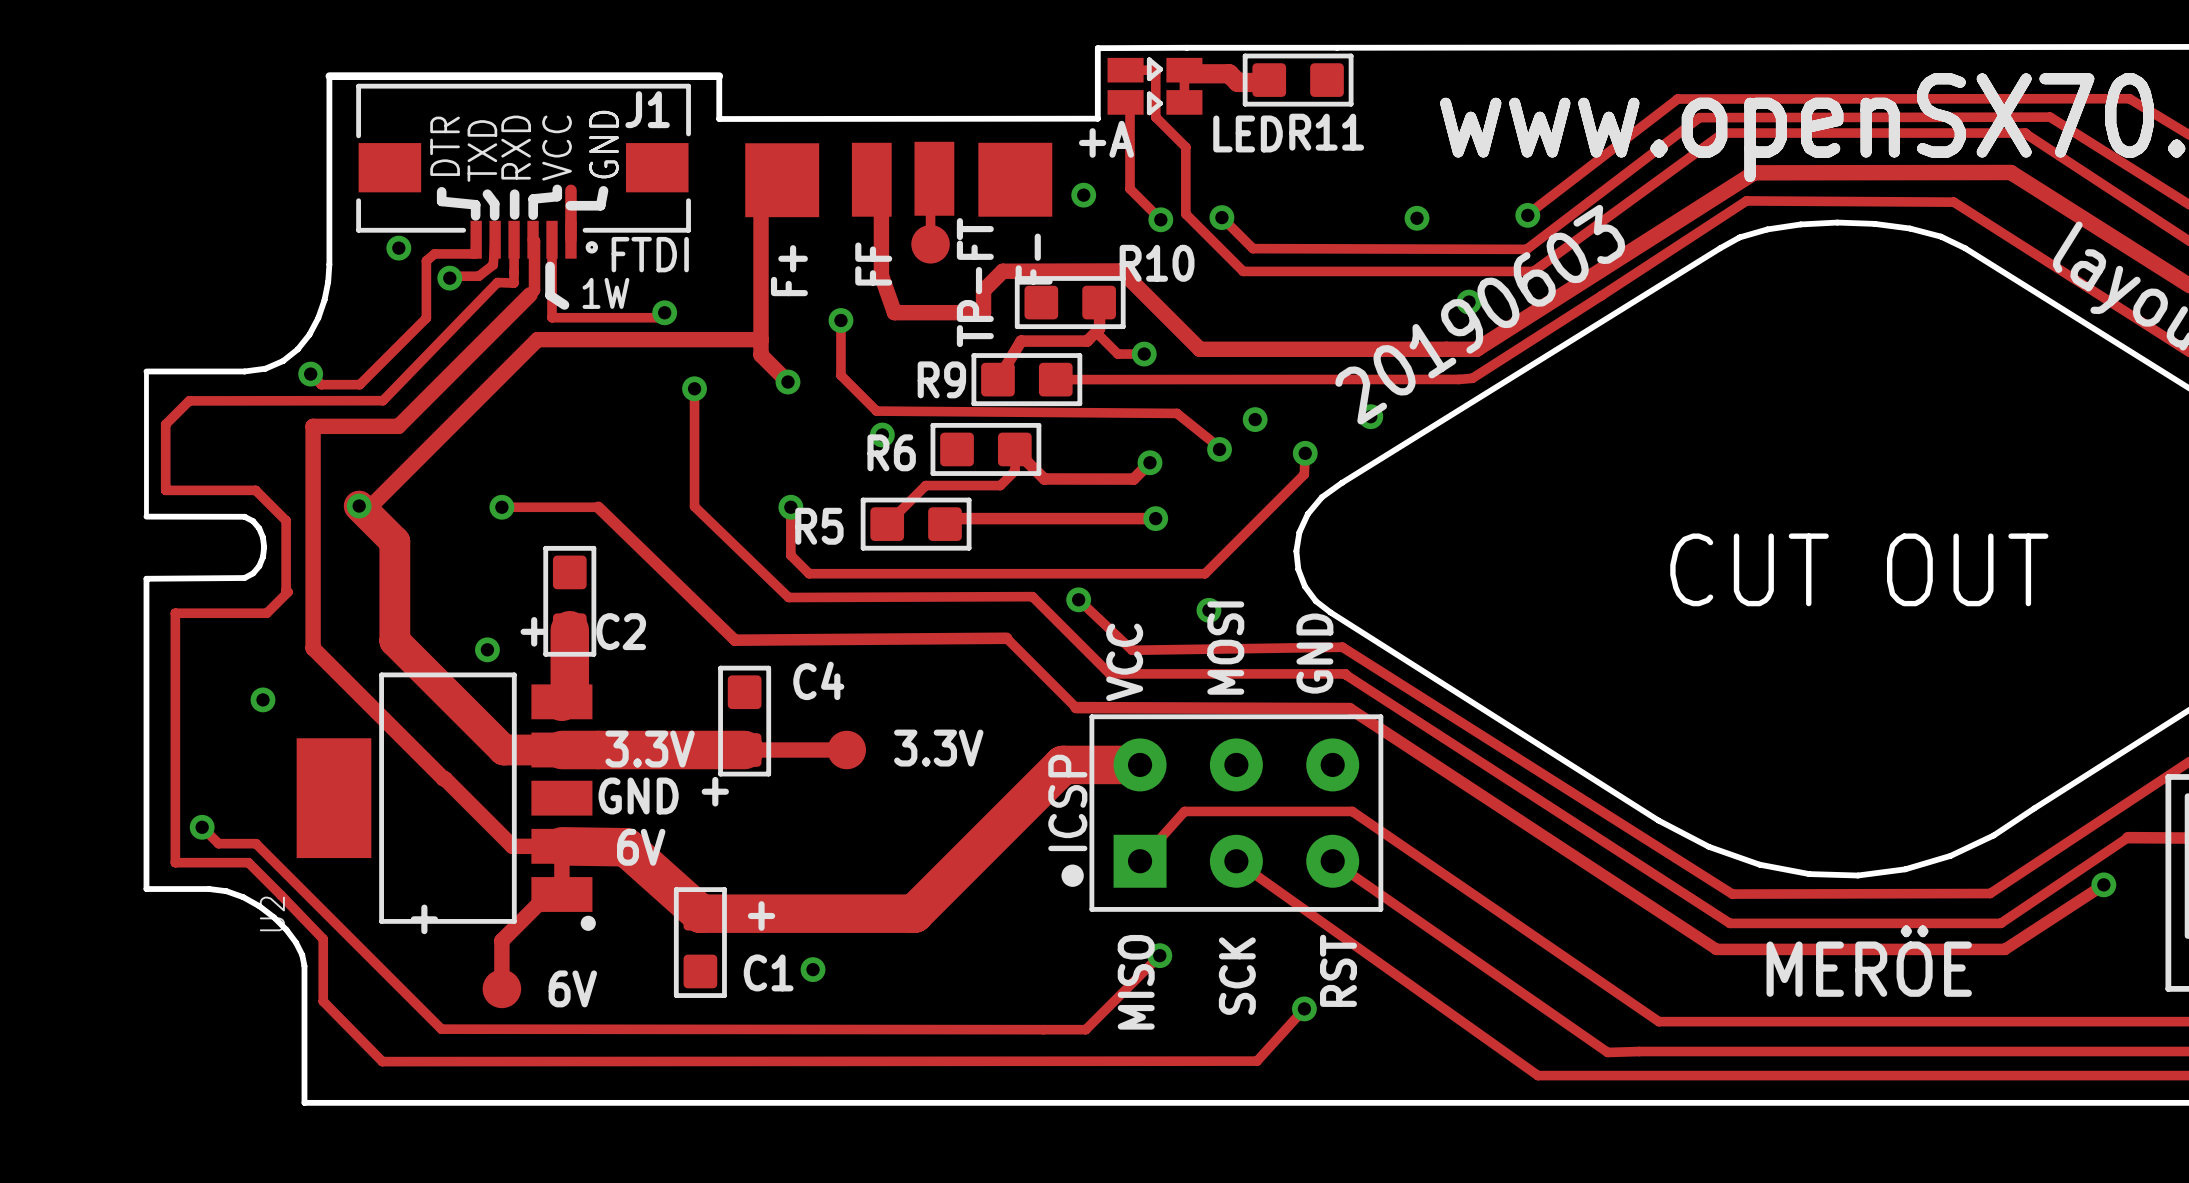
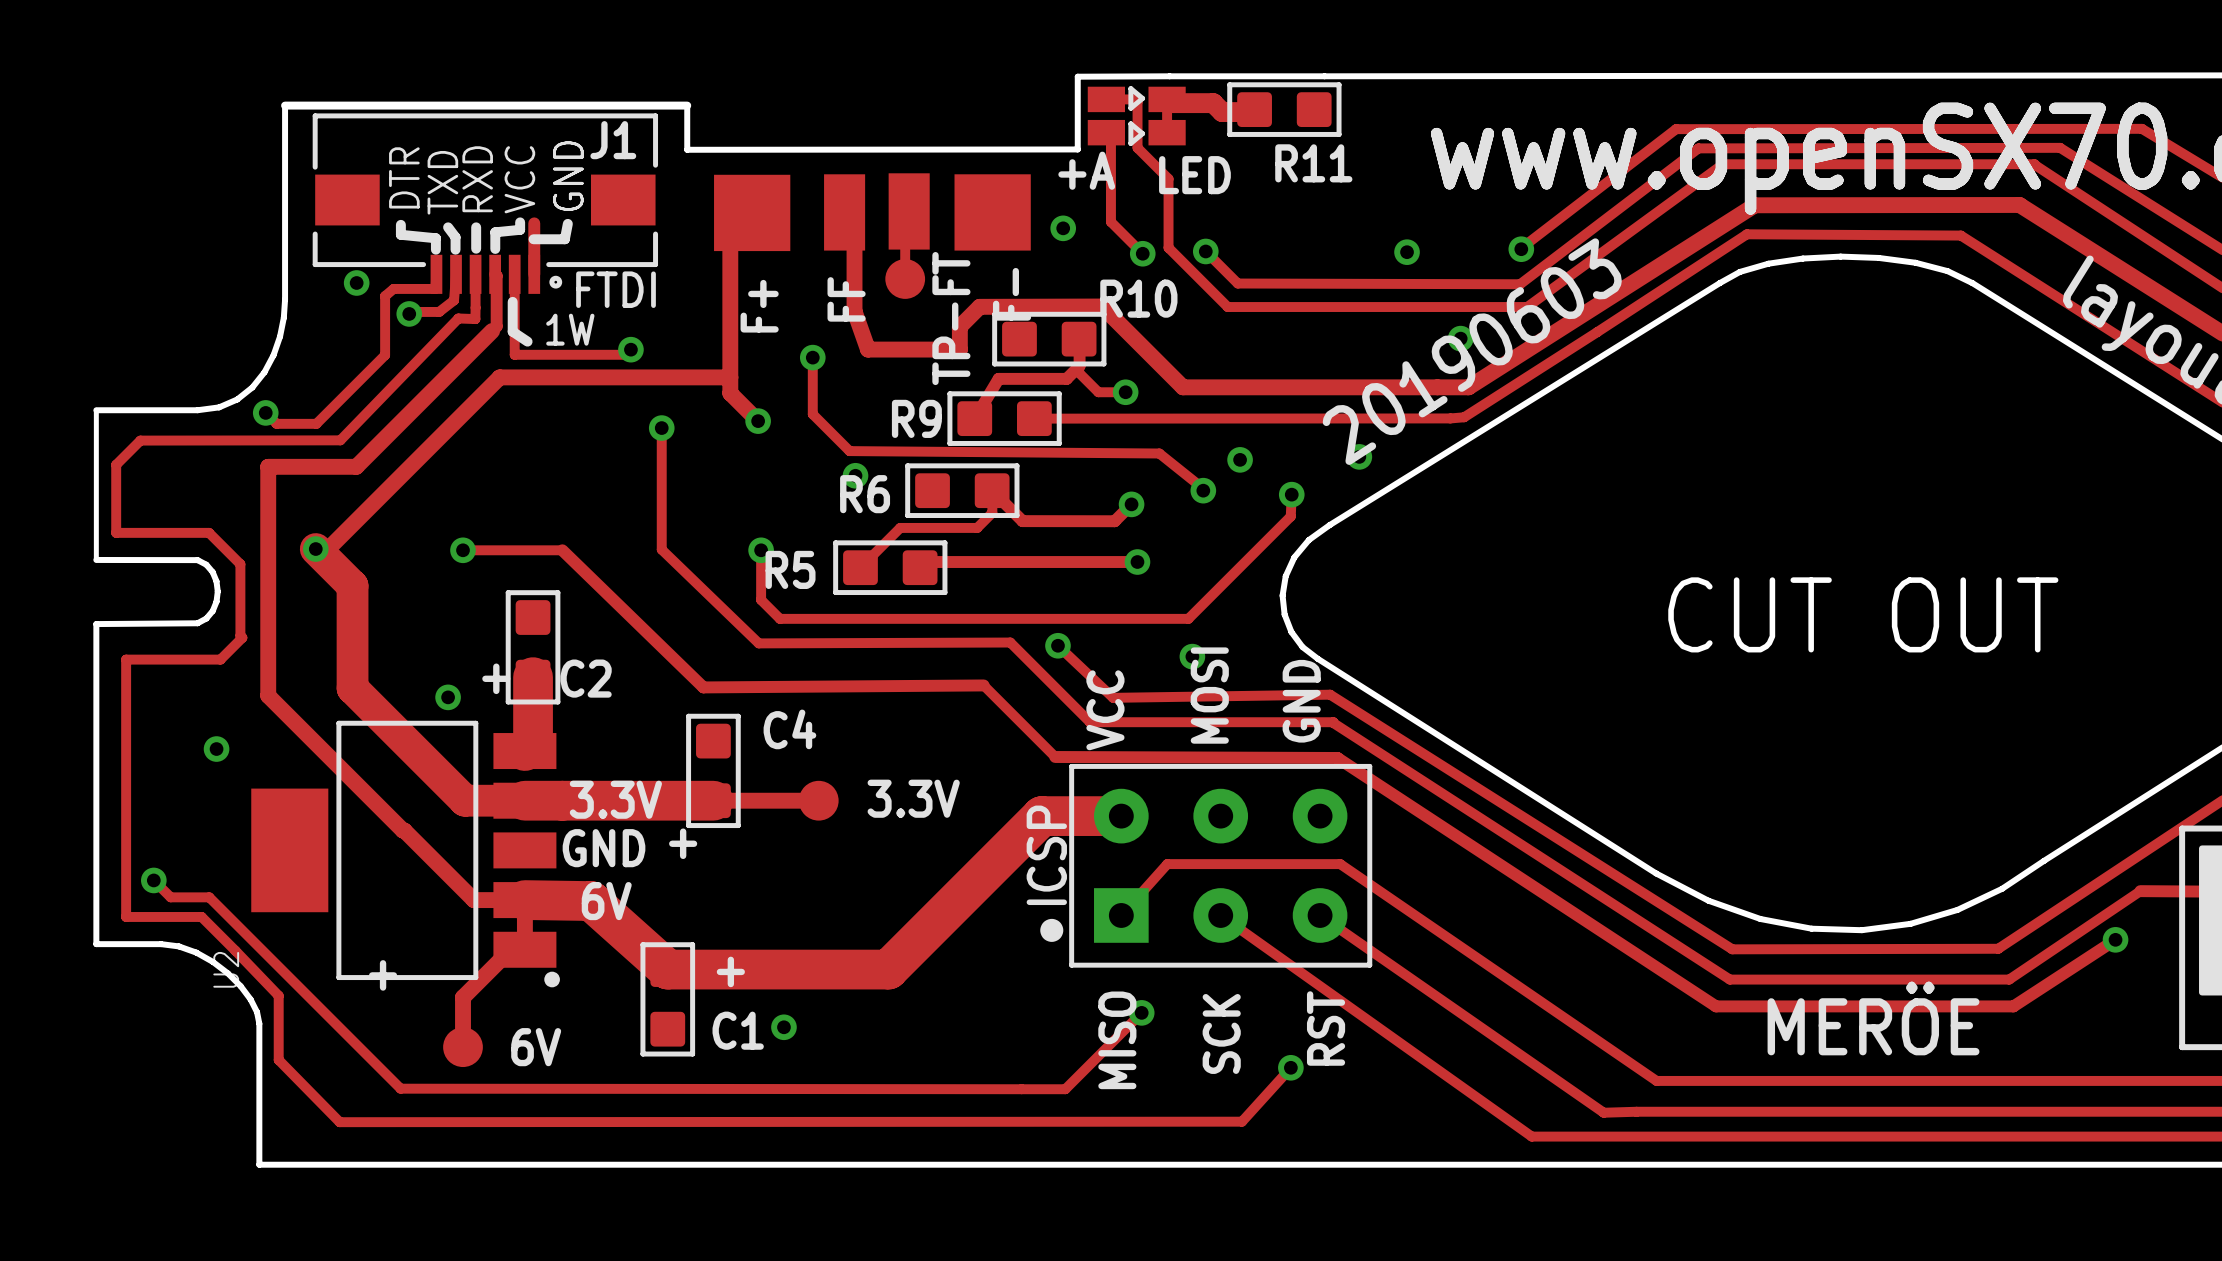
text position: LED (1248, 133) -> LED (1194, 175)

